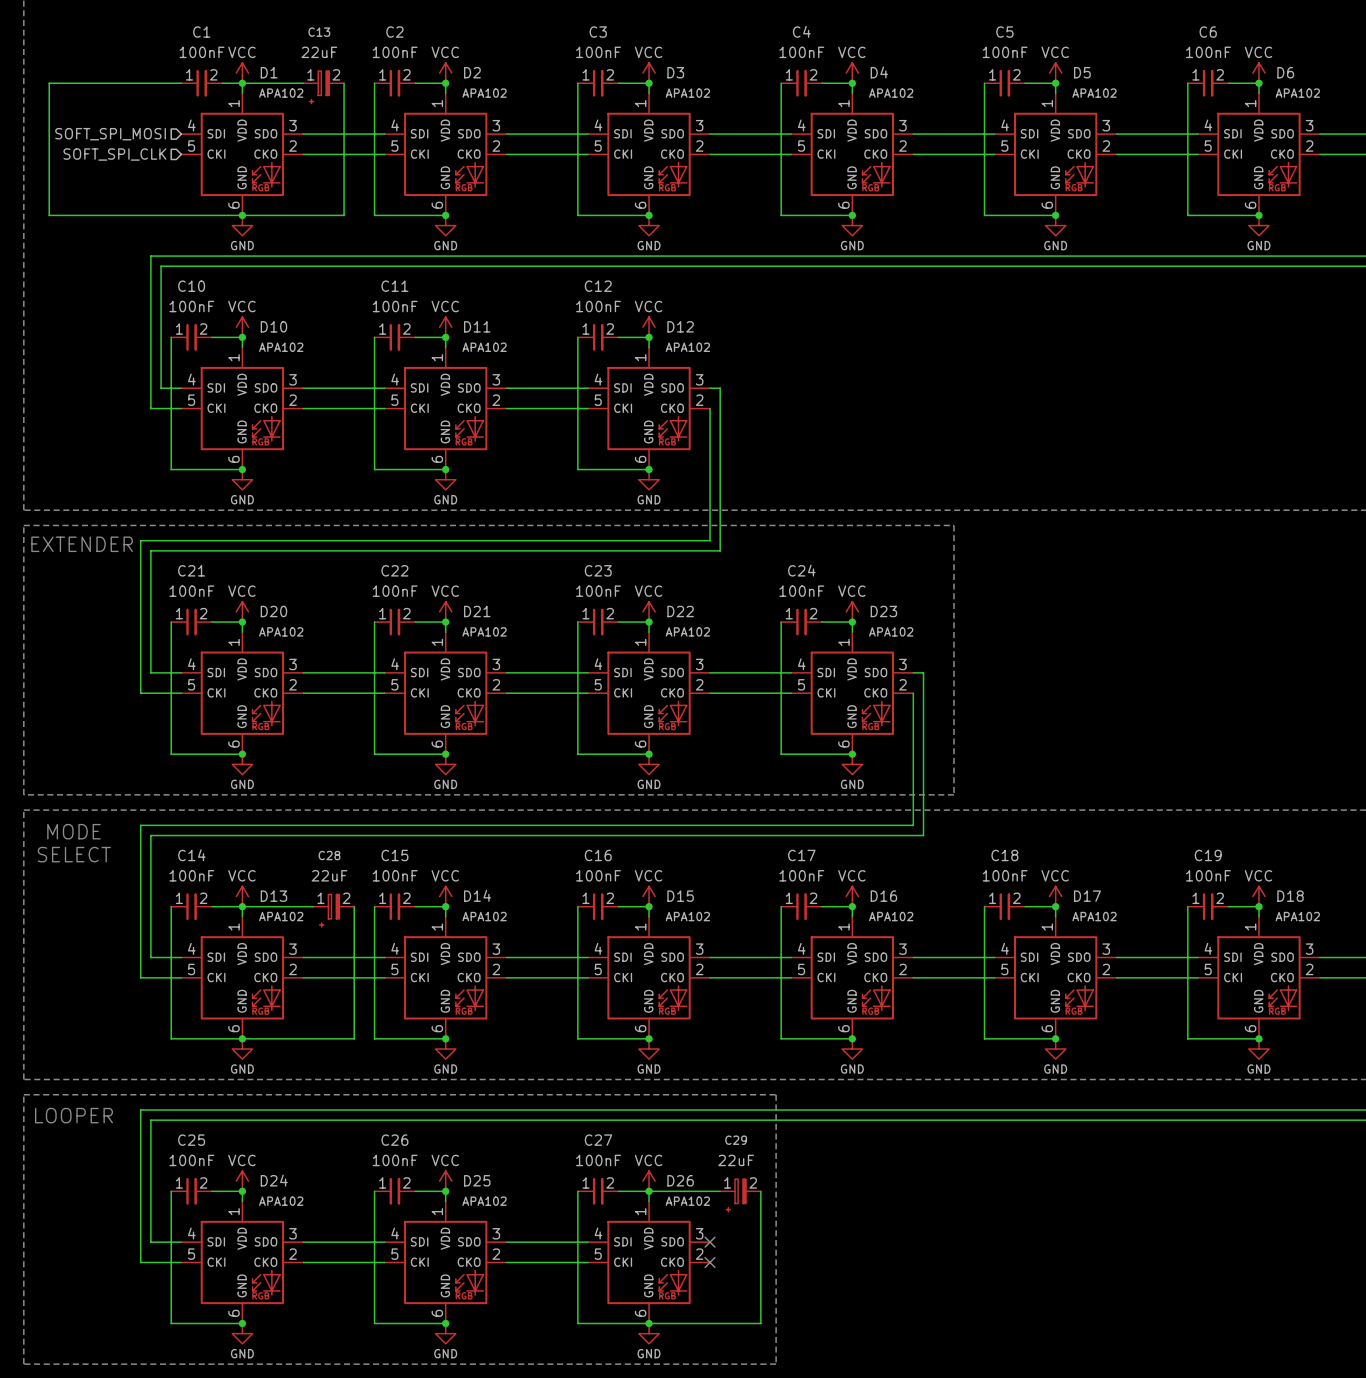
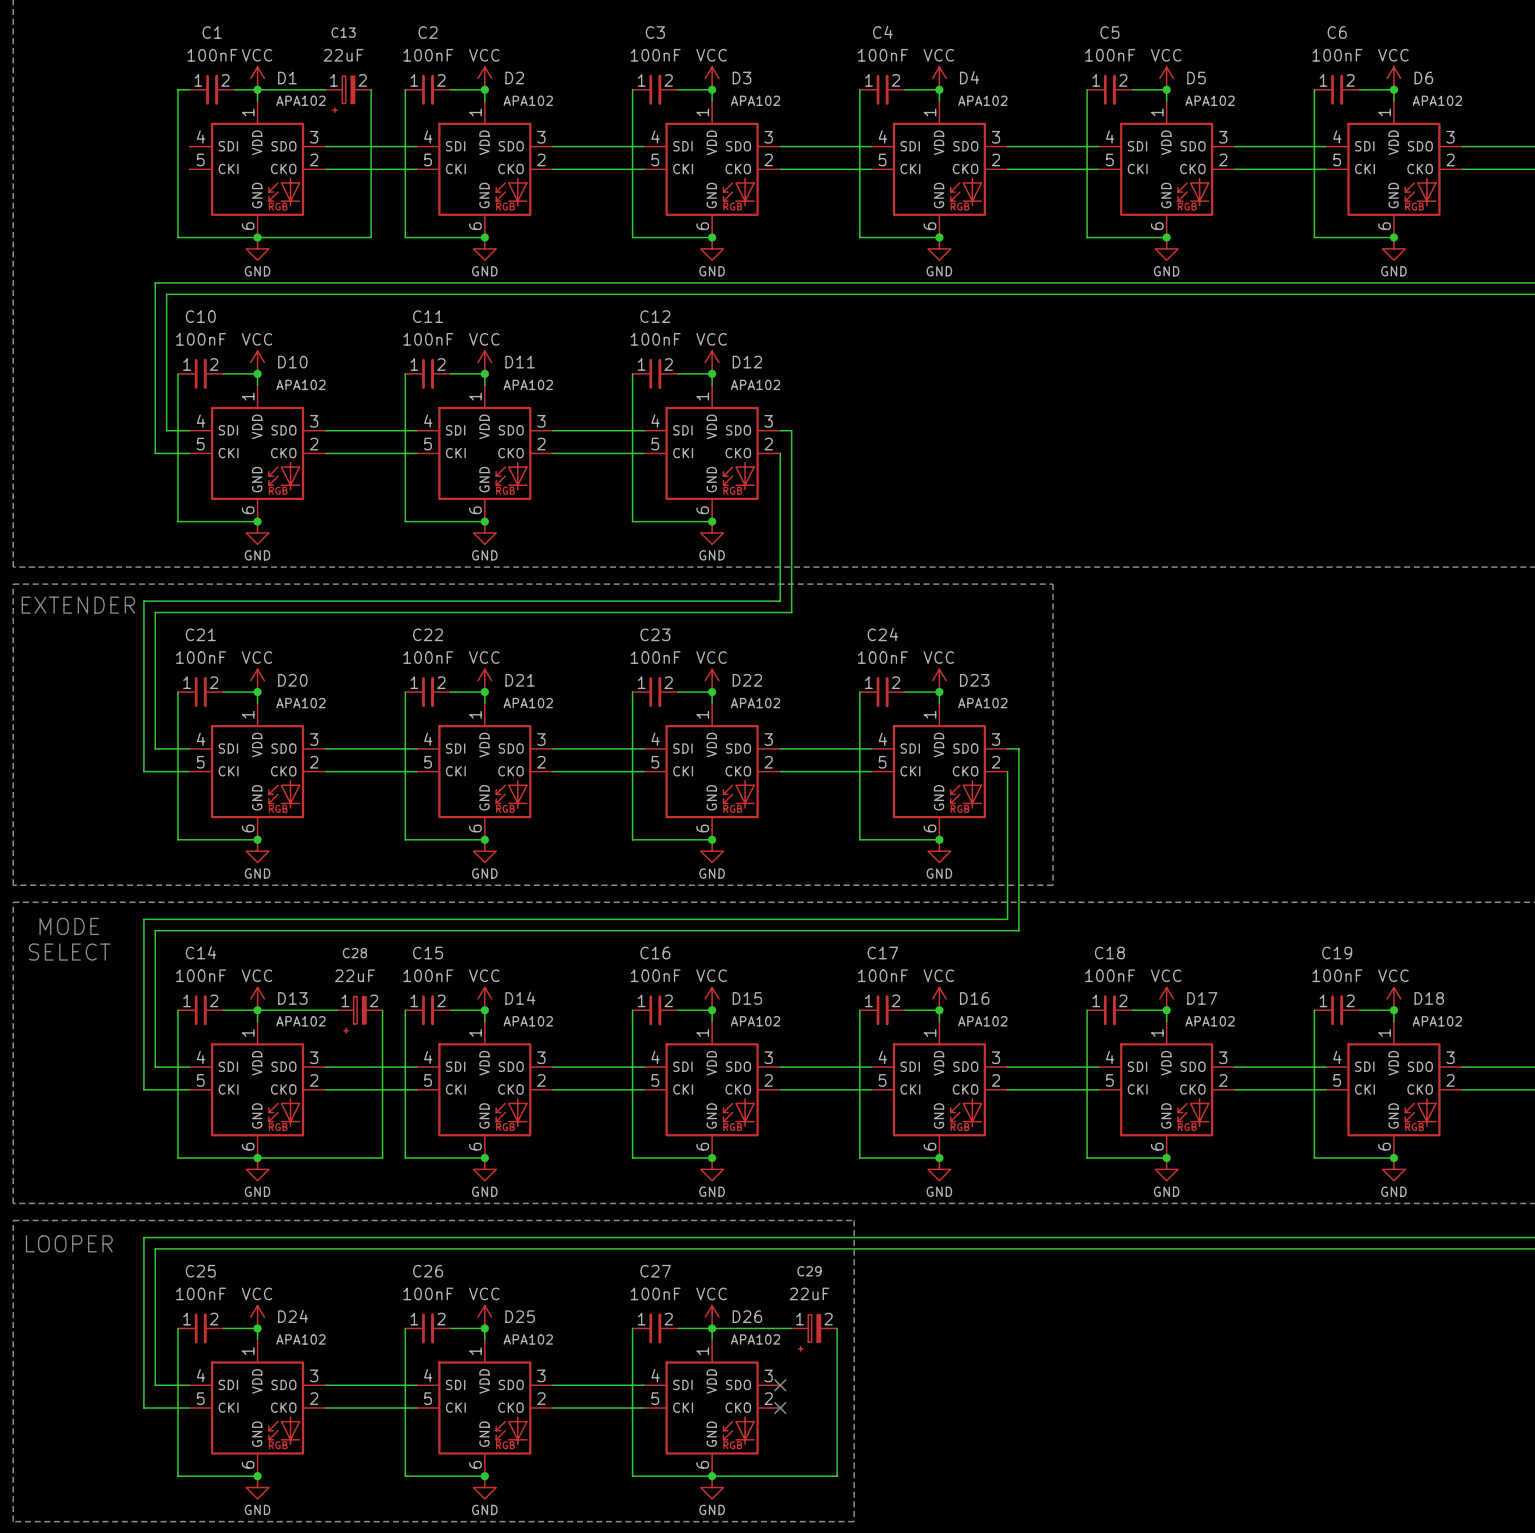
wire: (171, 83) (49, 83) (49, 215) (171, 215) -> (178, 89) (178, 237)
hierarchical label: SOFT_SPI_MOSI (110, 134) -> none
hierarchical label: SOFT_SPI_CLK (114, 154) -> none

